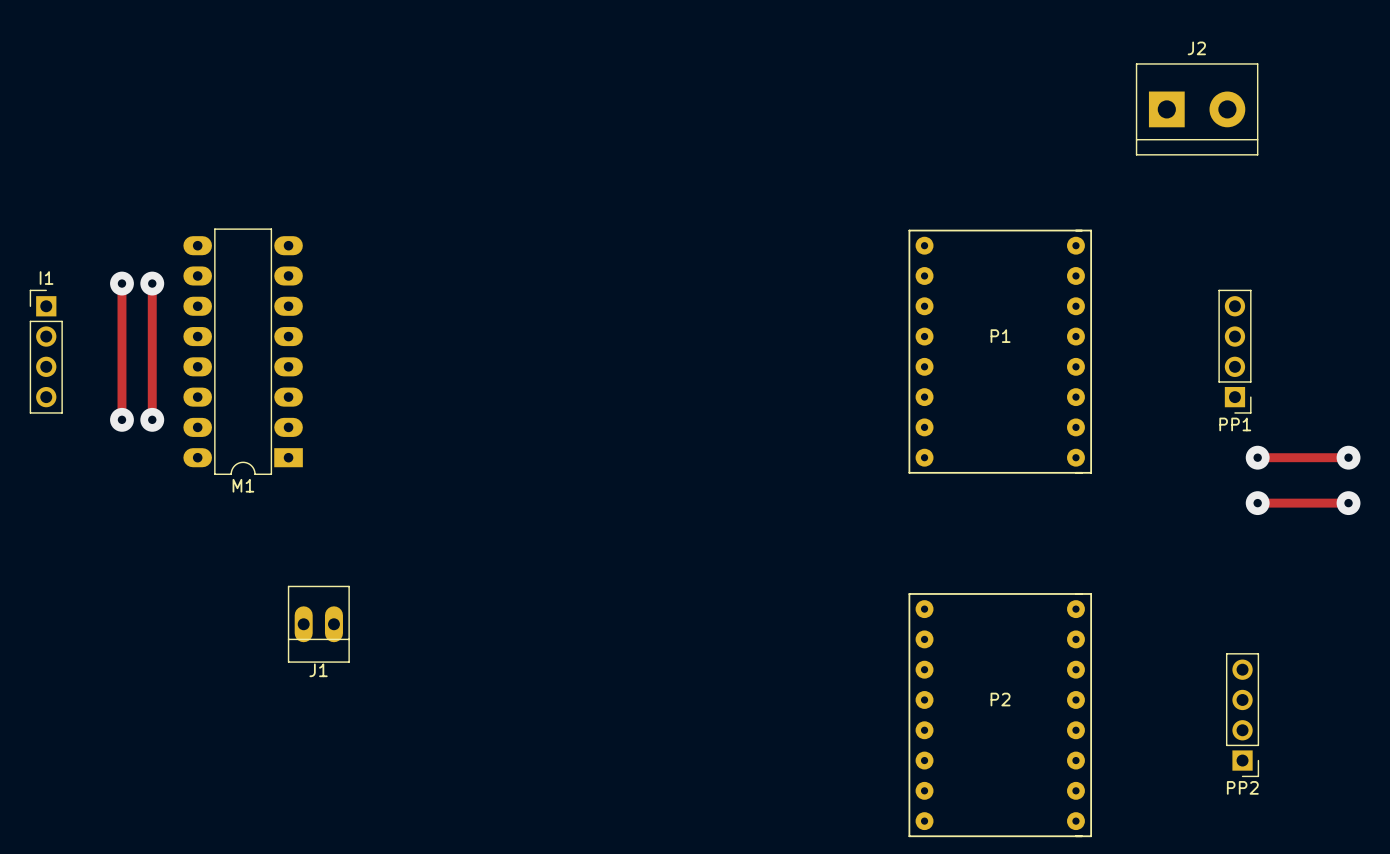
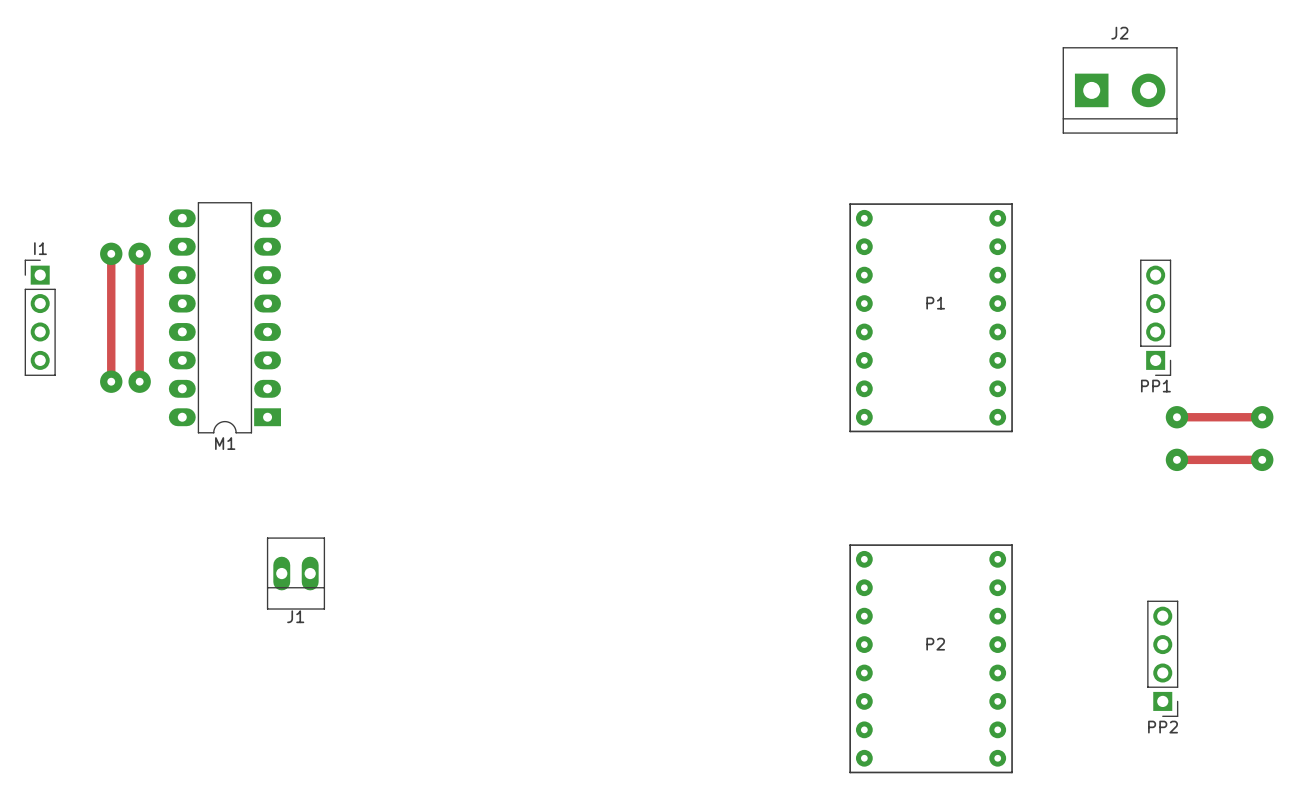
P1 footprint: [908, 229, 1093, 474] -> [849, 203, 1013, 433]
P2 footprint: [908, 593, 1093, 838] -> [849, 544, 1013, 774]

